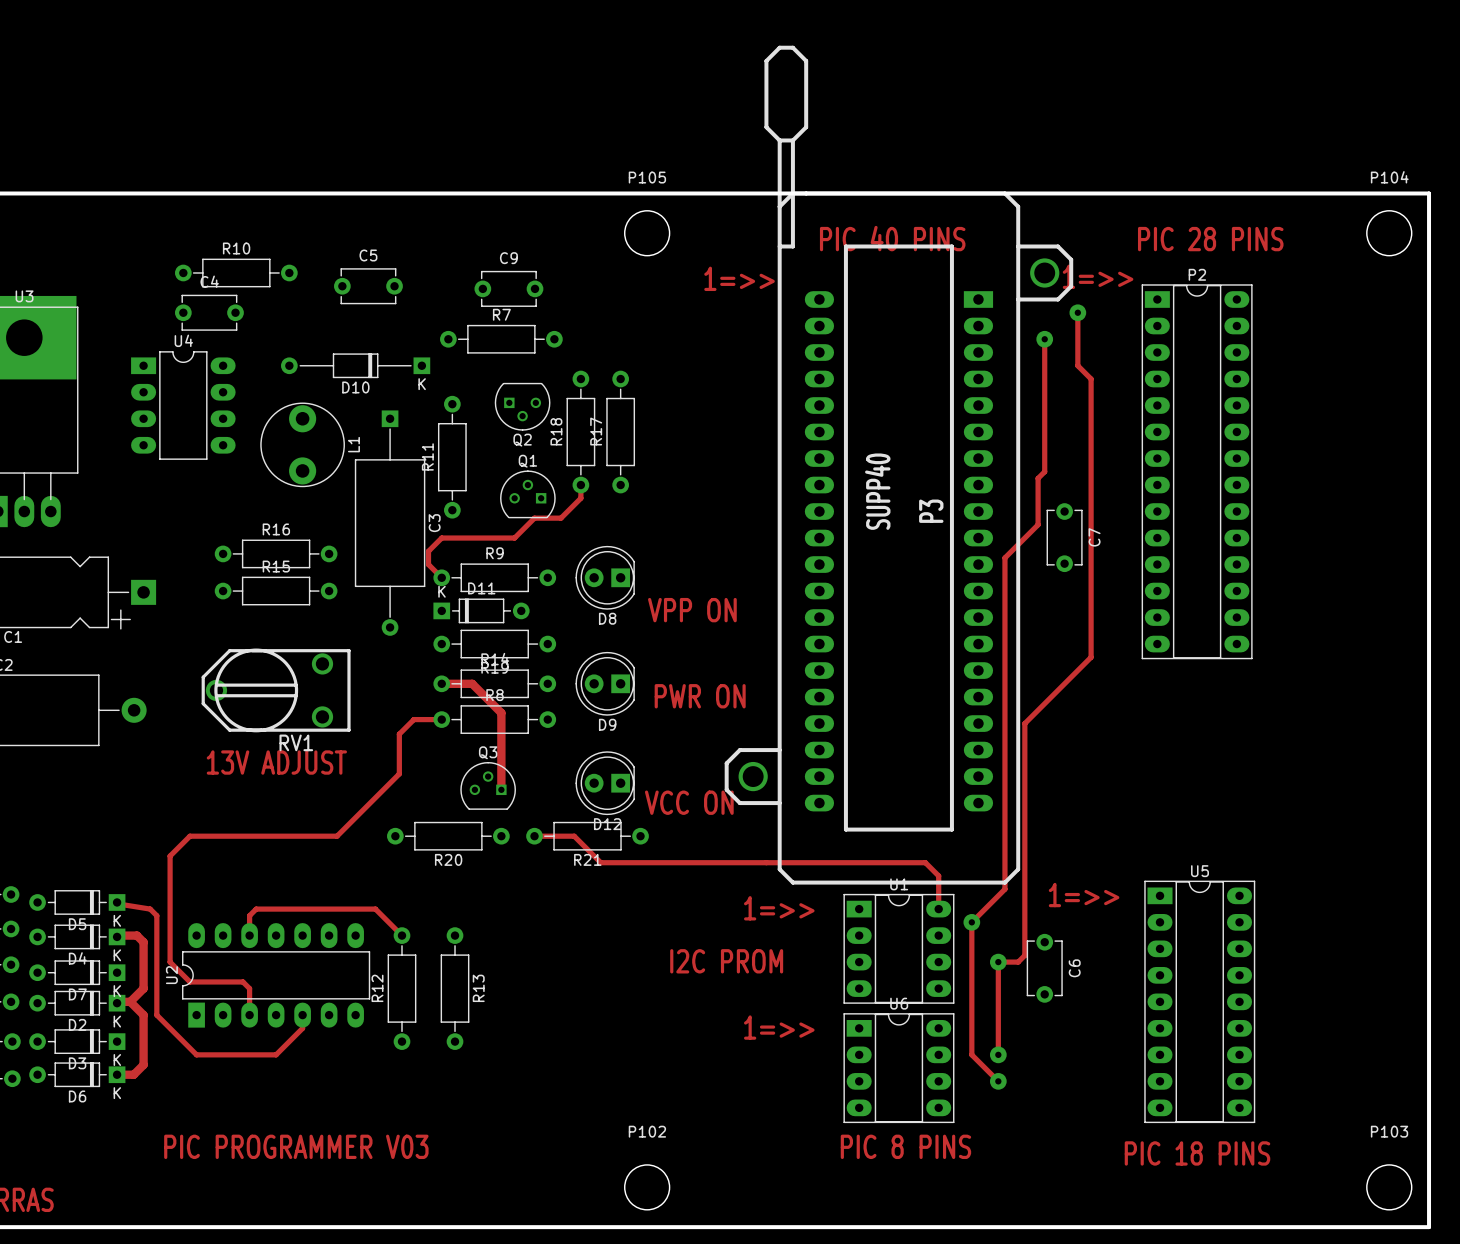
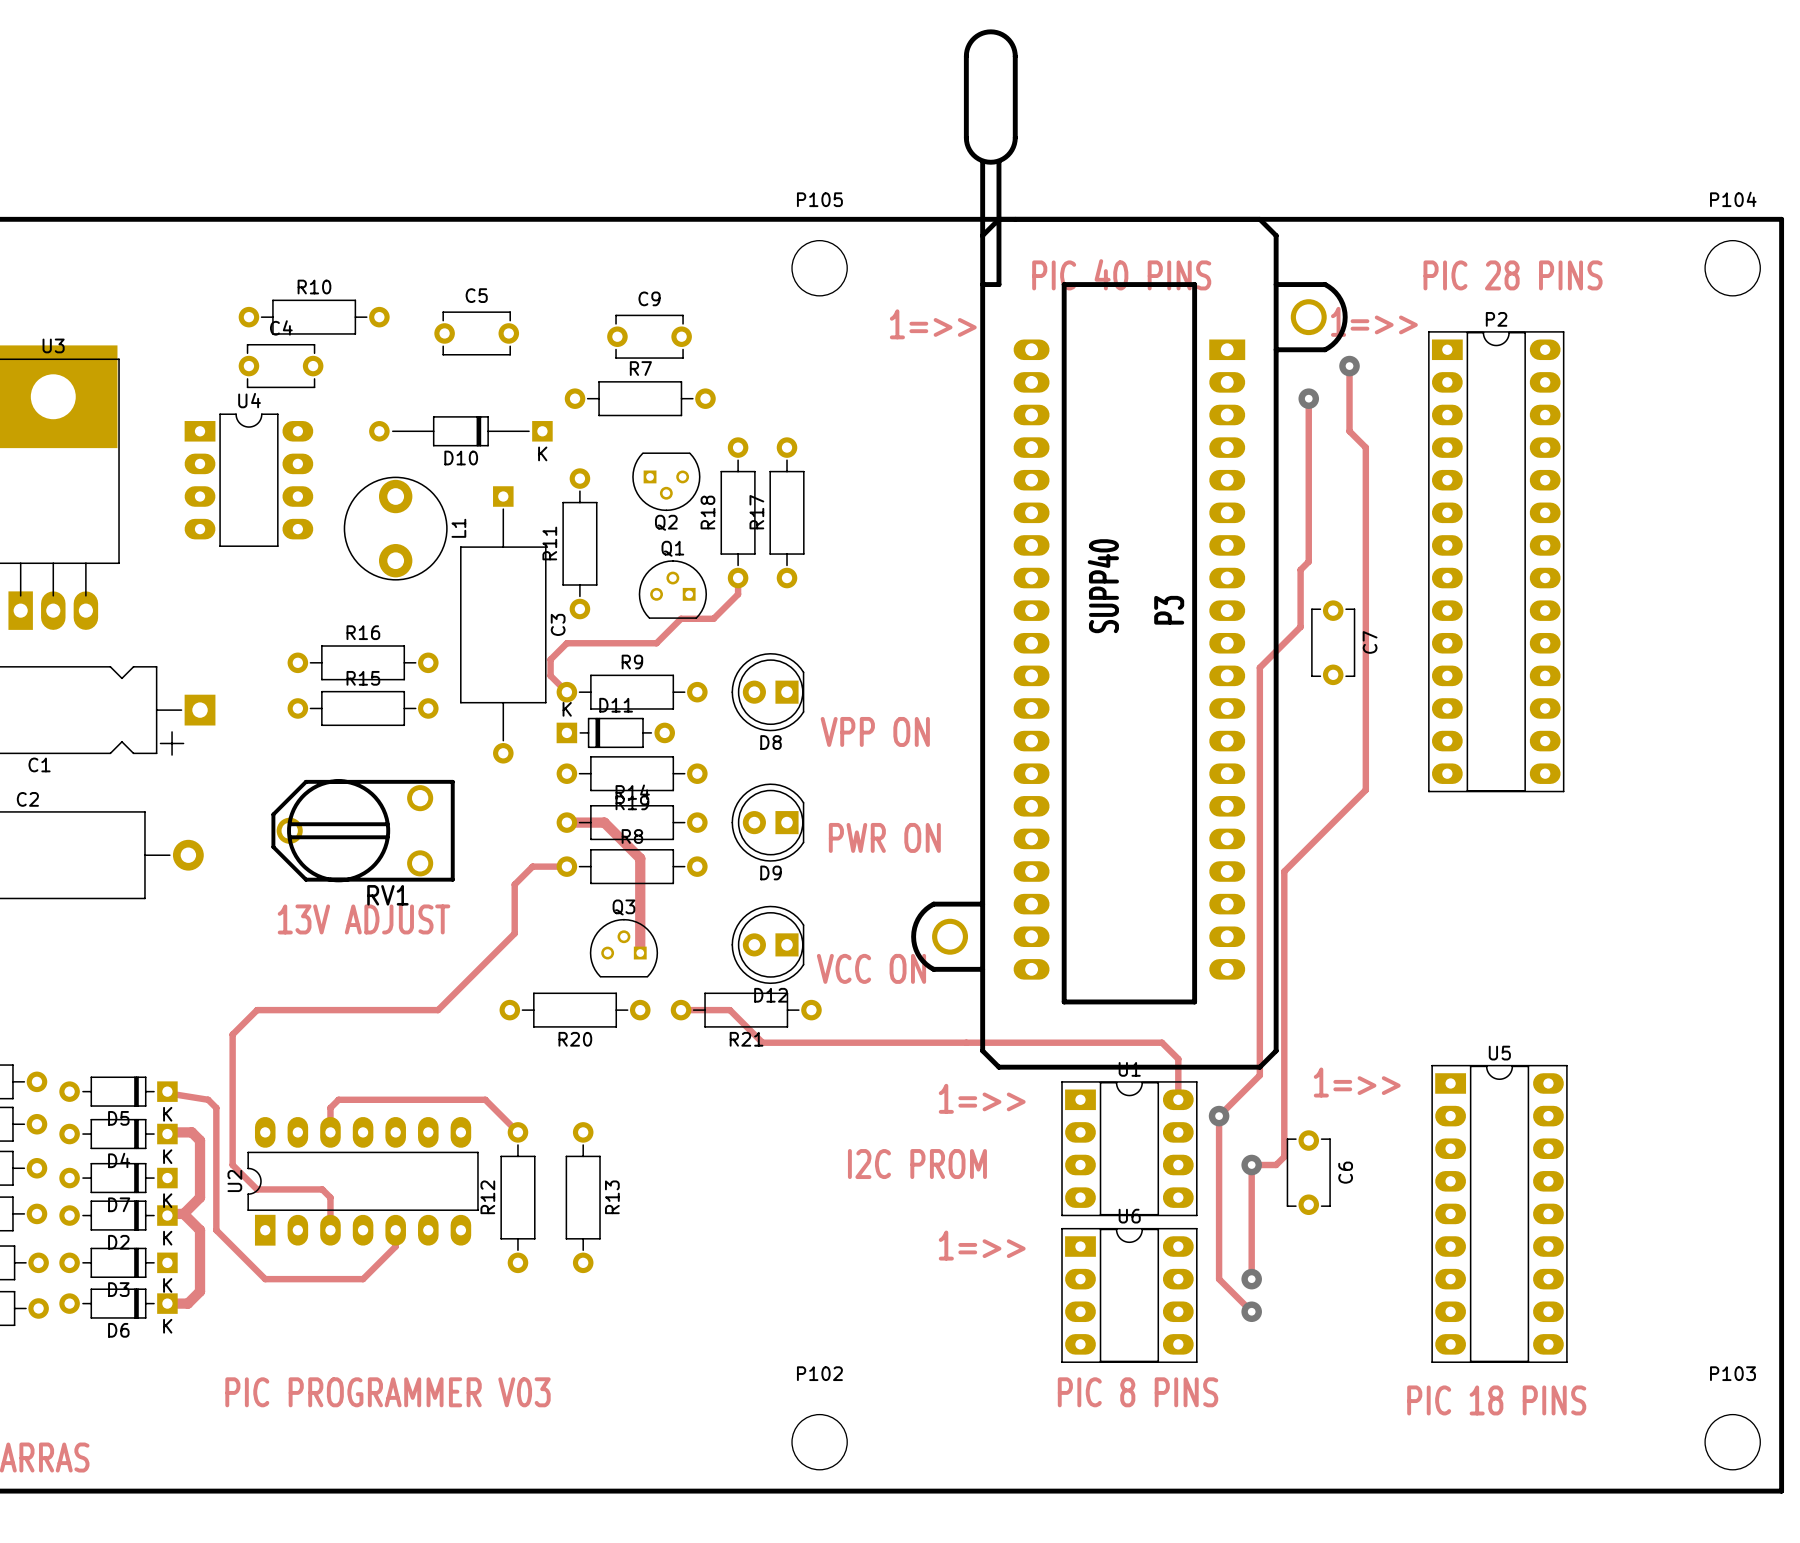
P3 footprint: [724, 45, 1074, 885] -> [911, 29, 1348, 1070]

